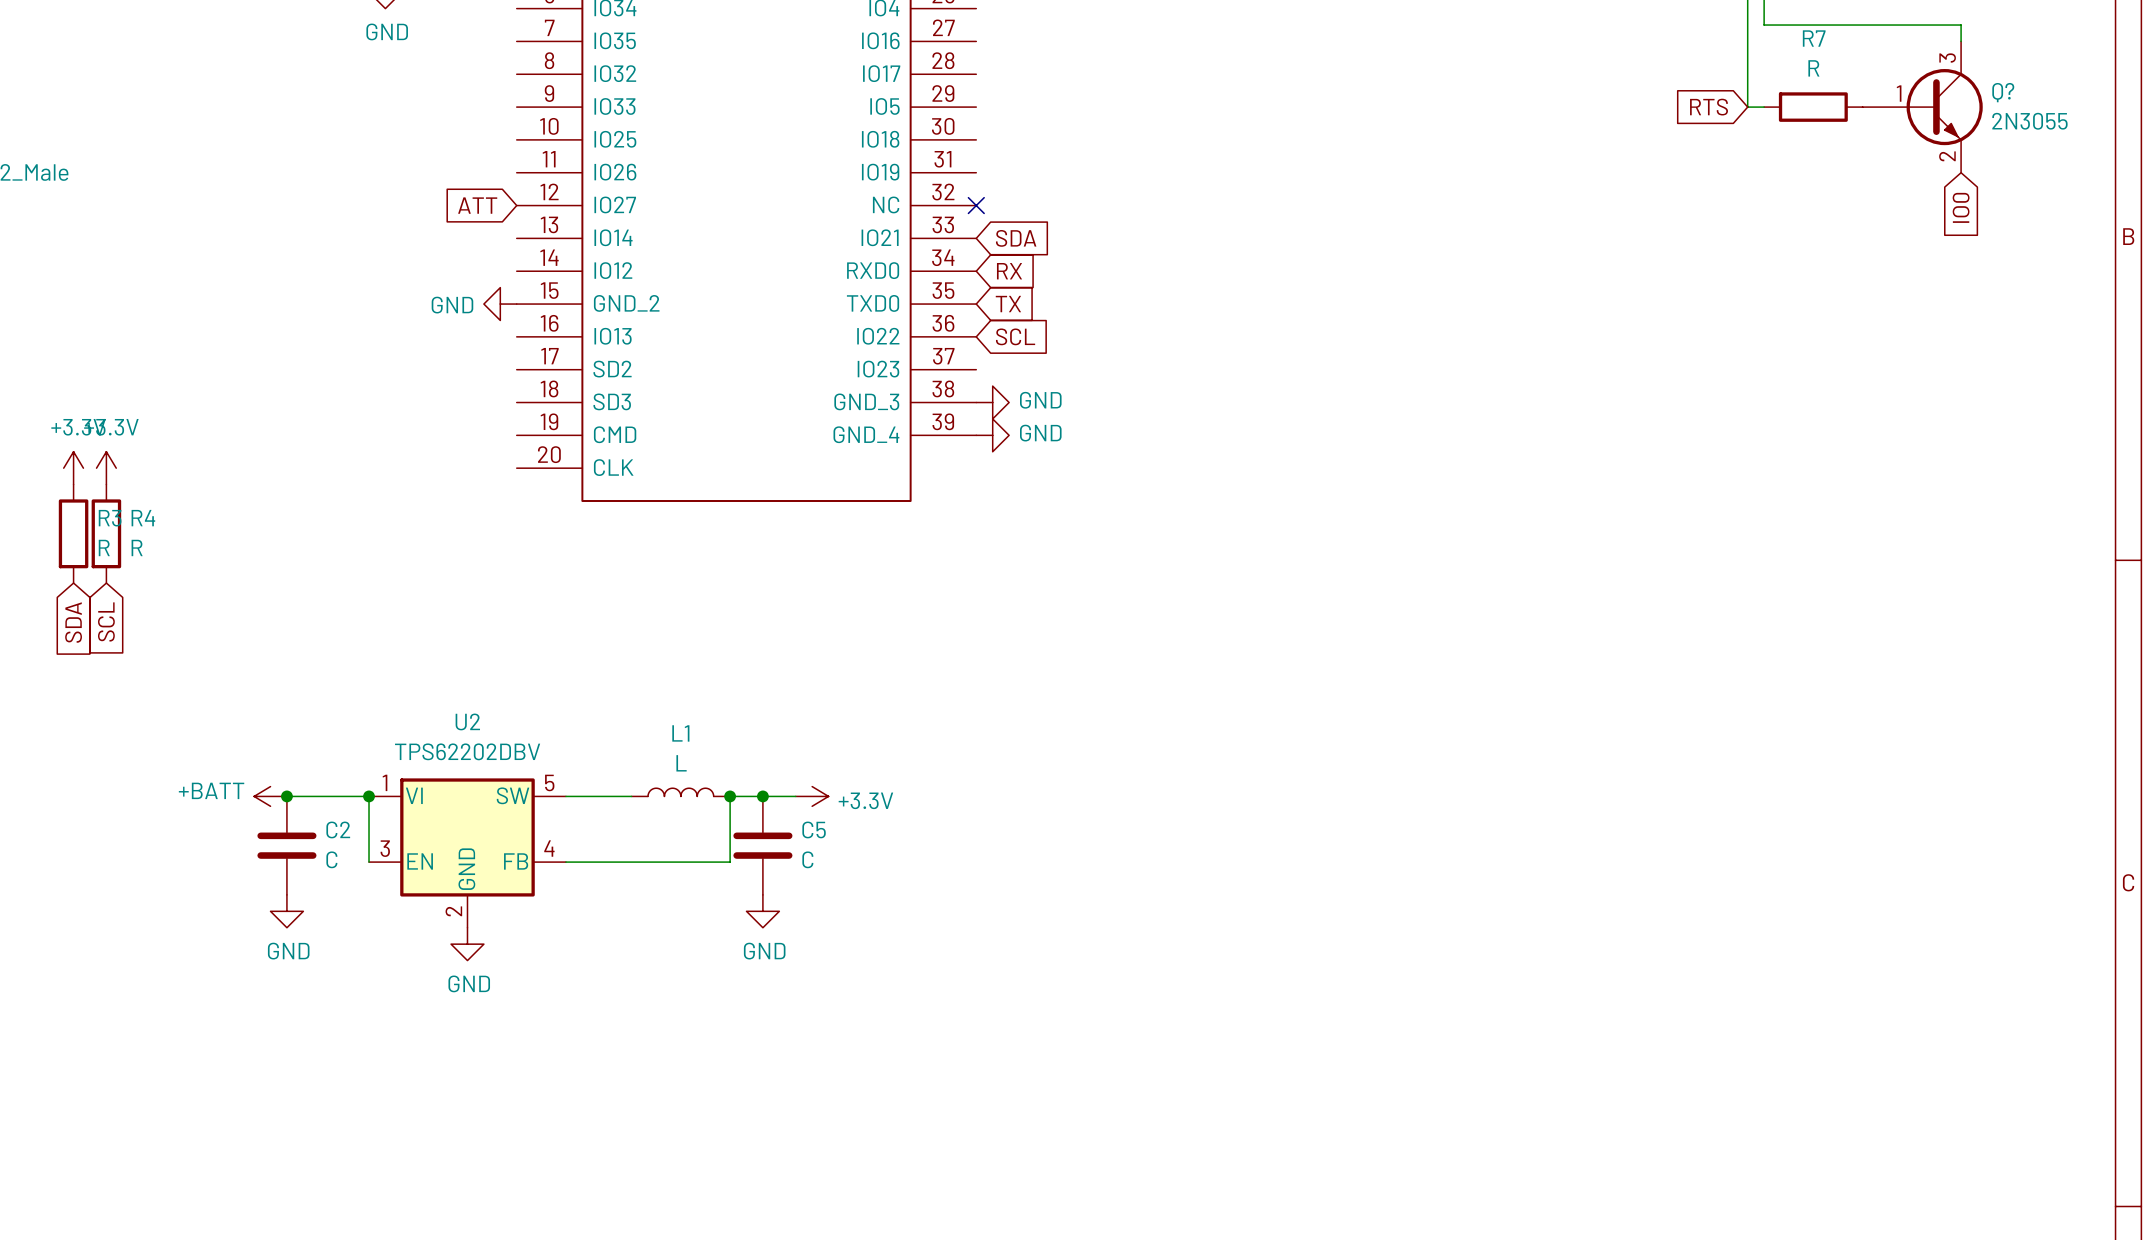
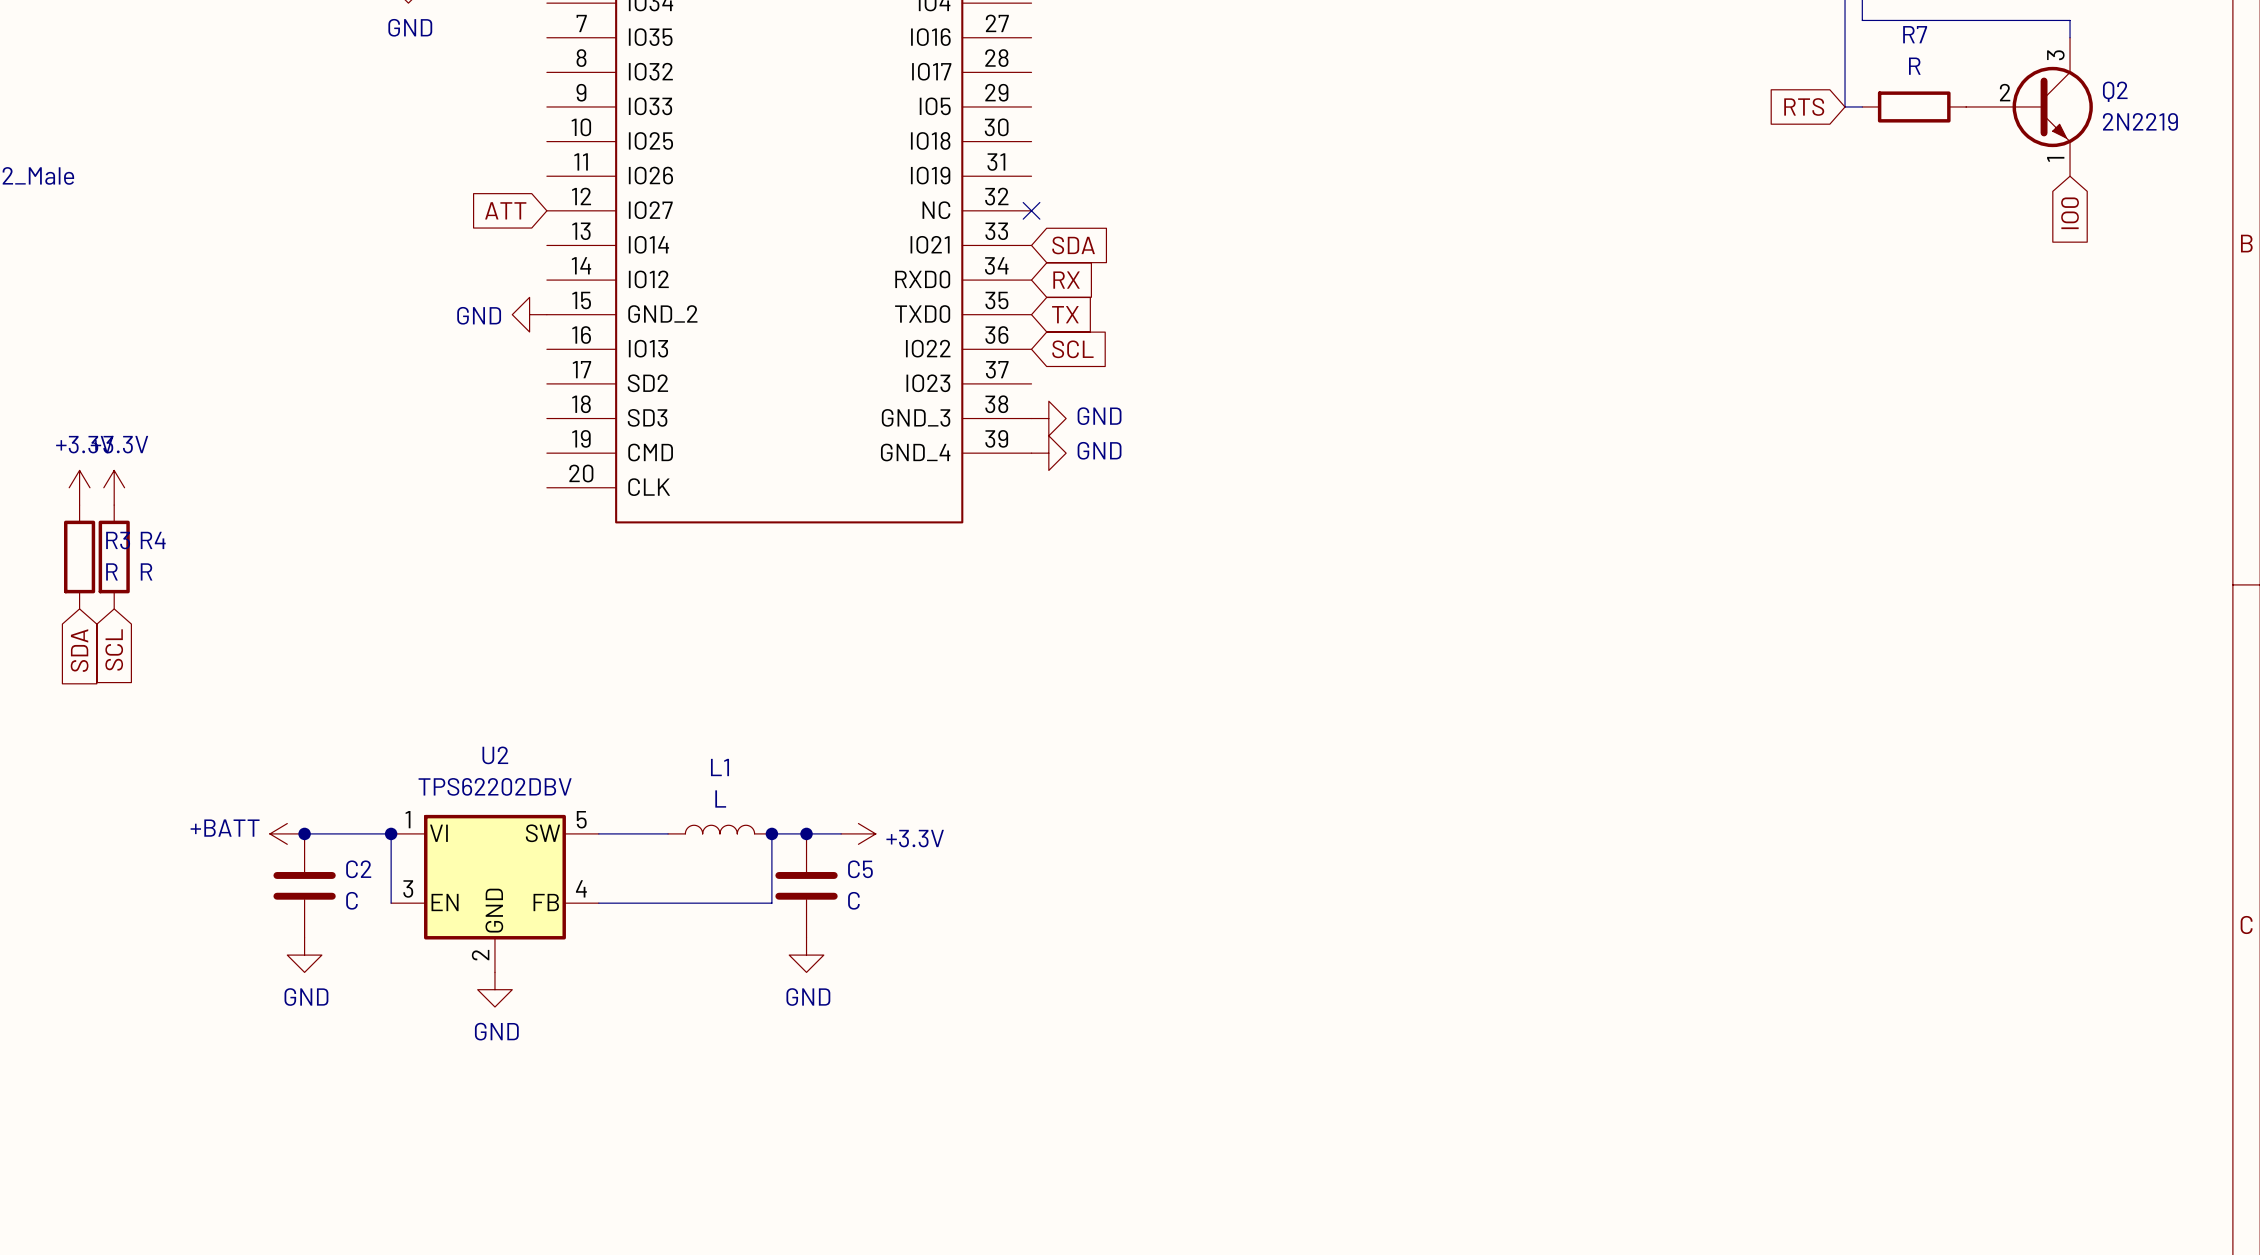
Q? name: Q? (2003, 92) -> Q2 (2115, 91)
Q? pin number: 1 (1899, 93) -> 2 (2005, 92)
Q? value: 2N3055 (2029, 121) -> 2N2219 (2140, 121)
Q? pin number: 2 (1947, 156) -> 1 (2055, 159)

